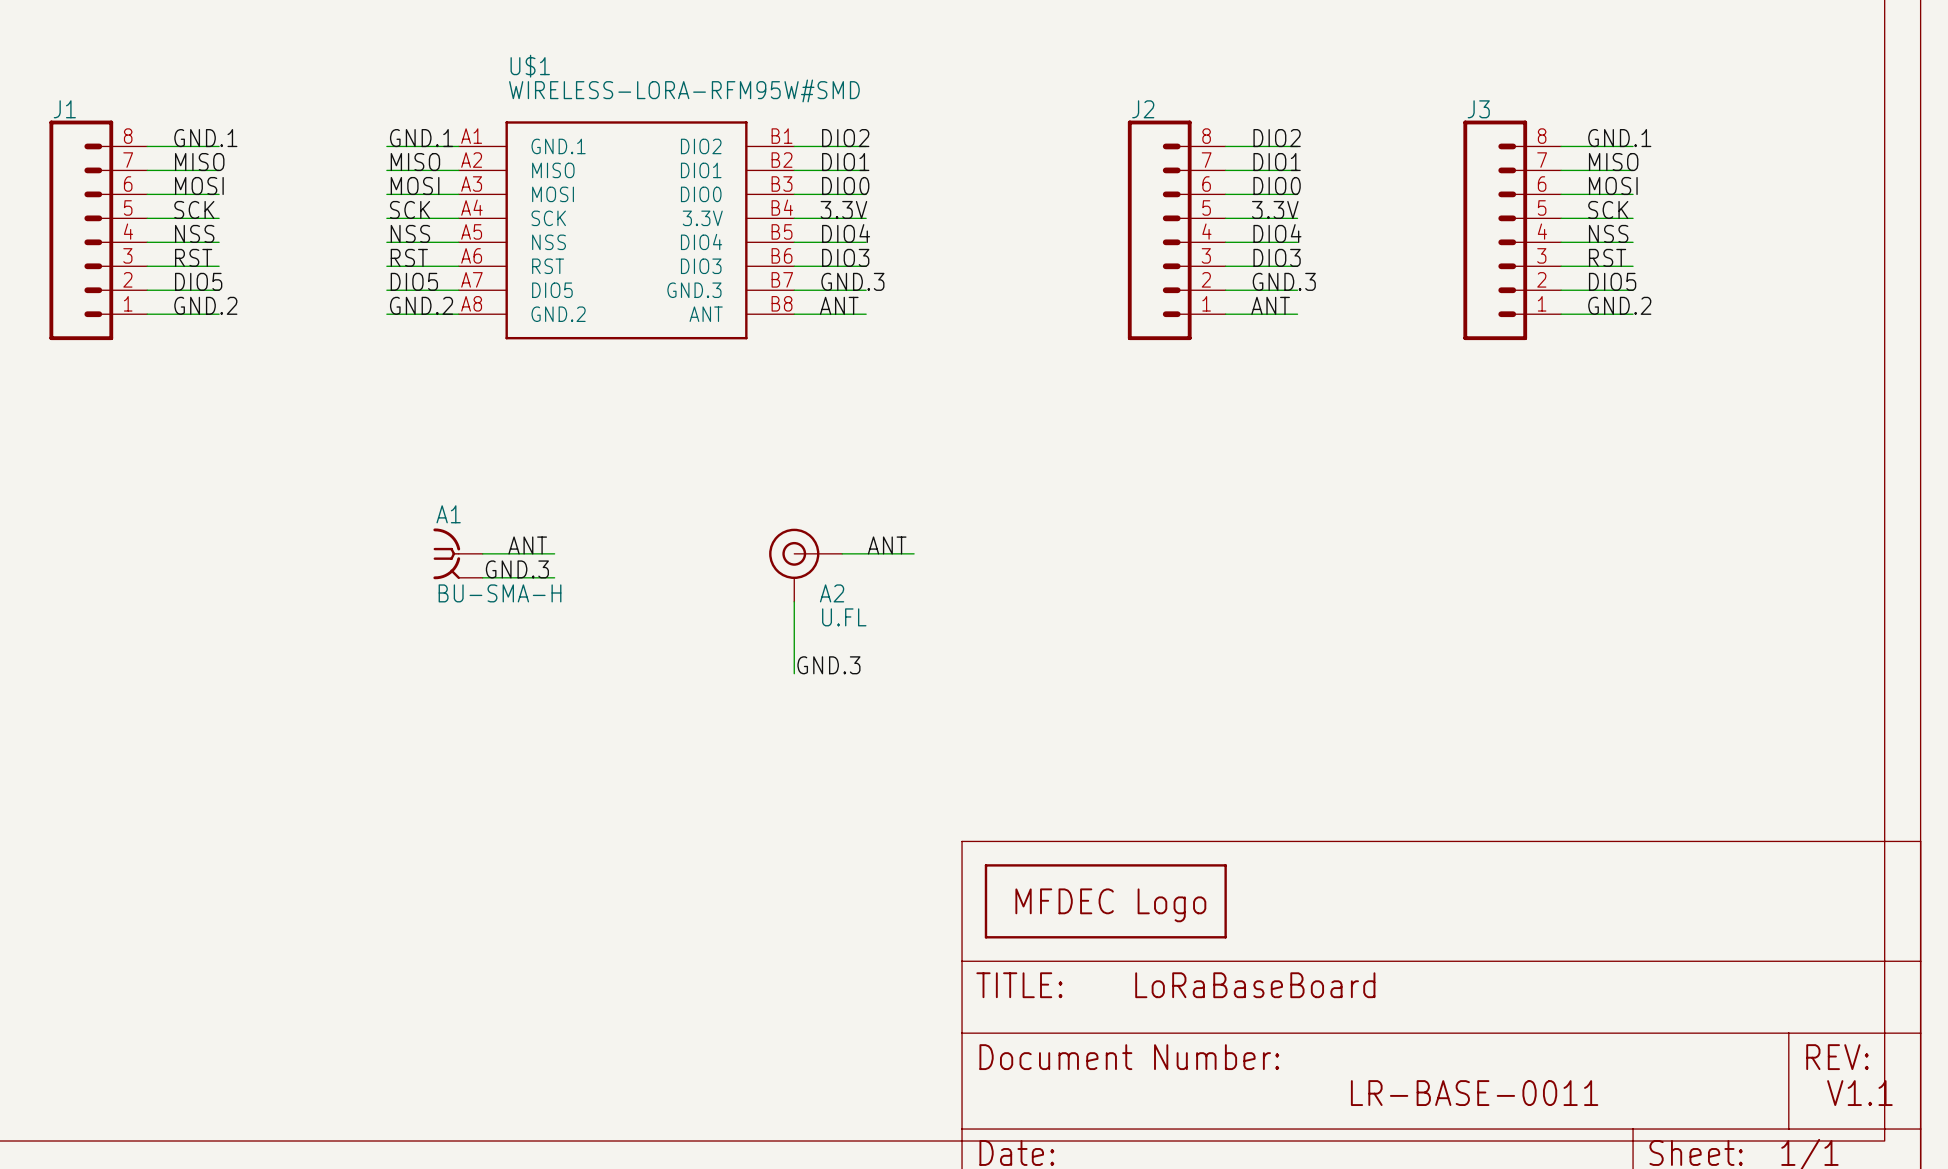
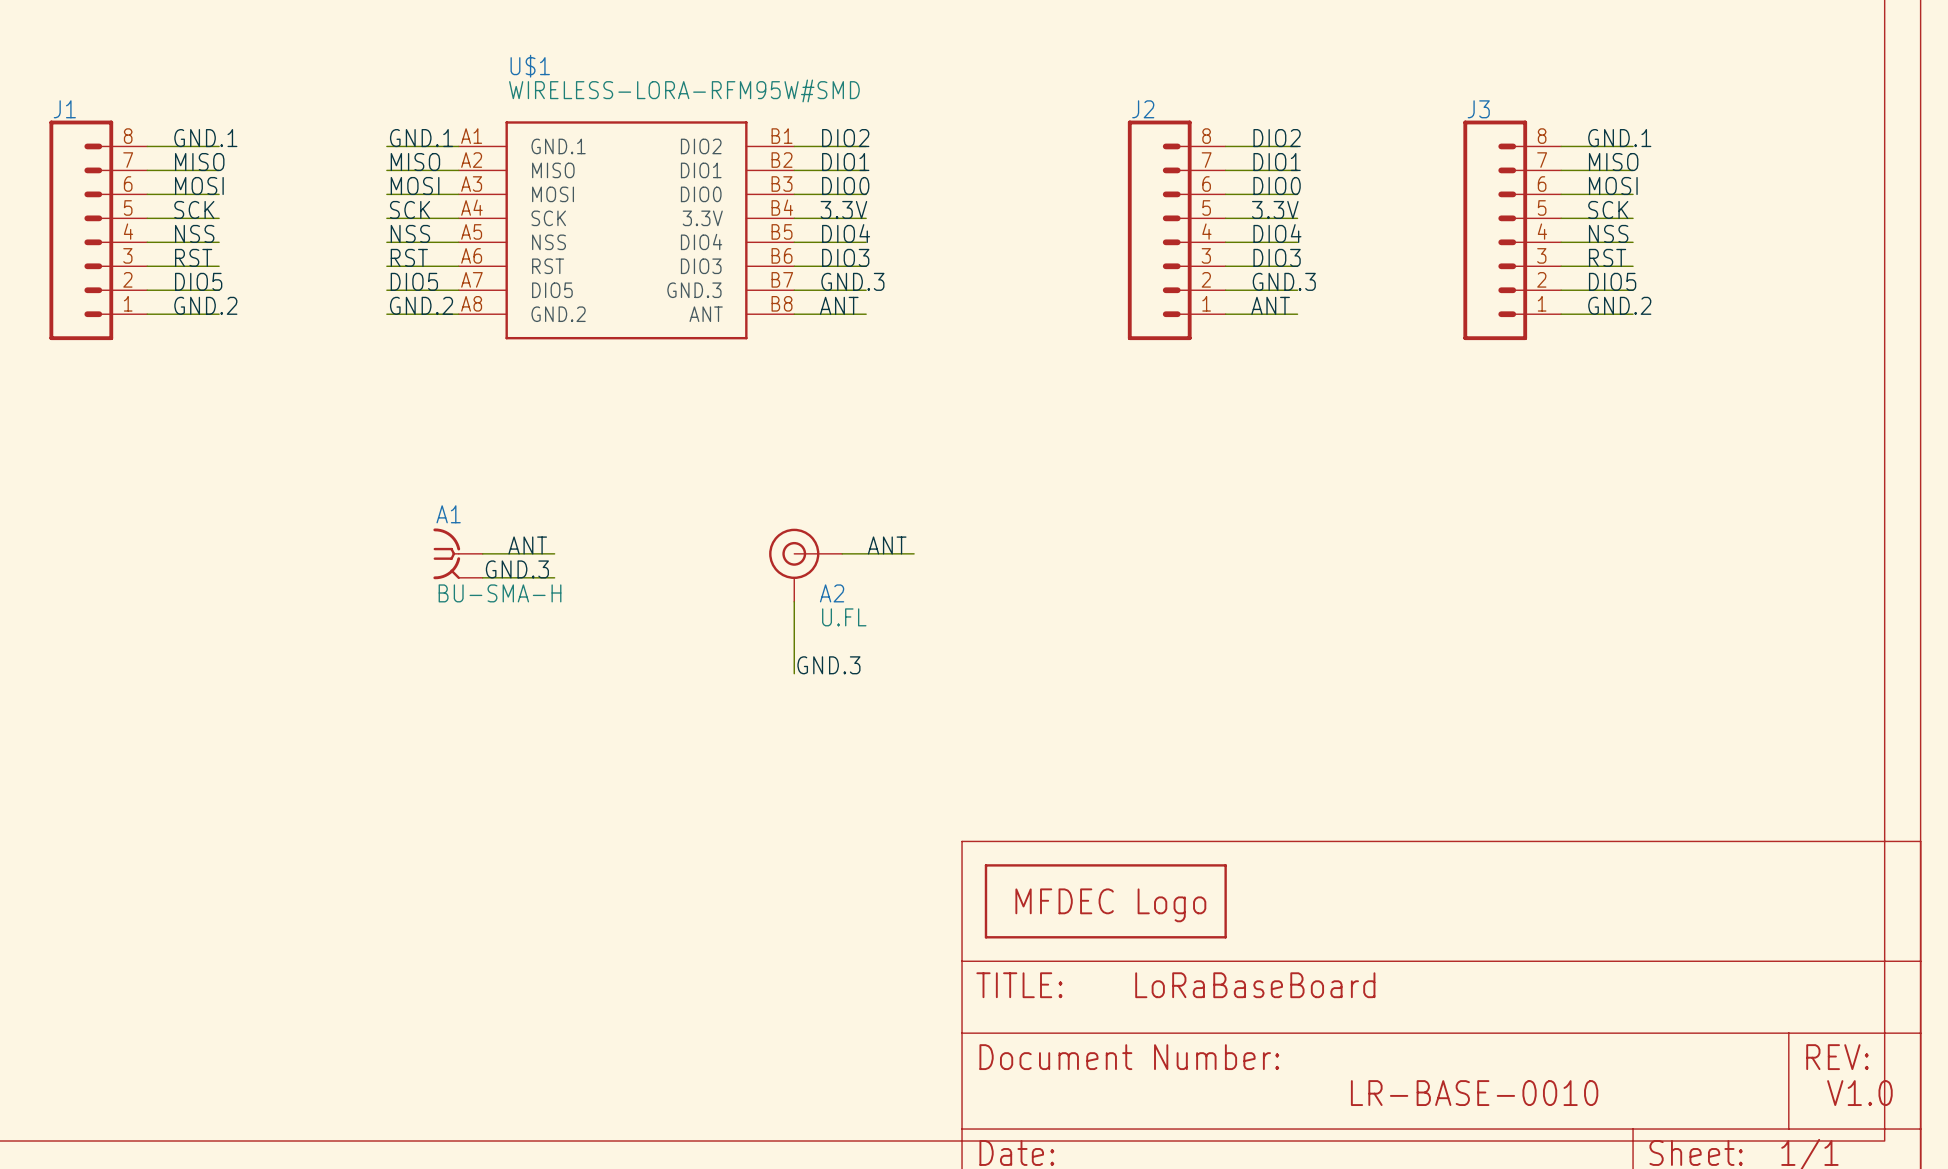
text: LR-BASE-0011 (1474, 1093) -> LR-BASE-0010 (1474, 1093)
text: V1.1 (1859, 1093) -> V1.0 (1859, 1093)

